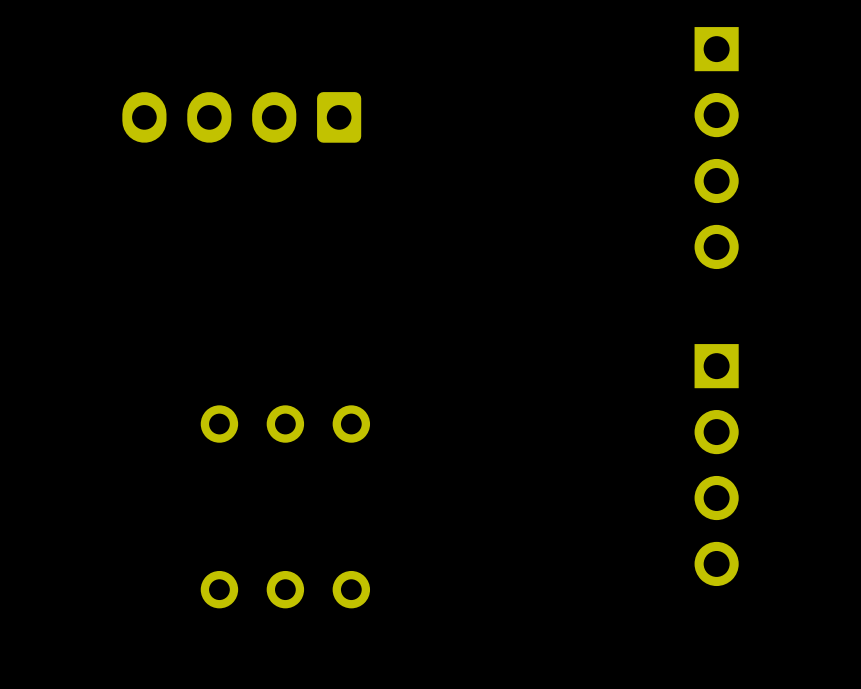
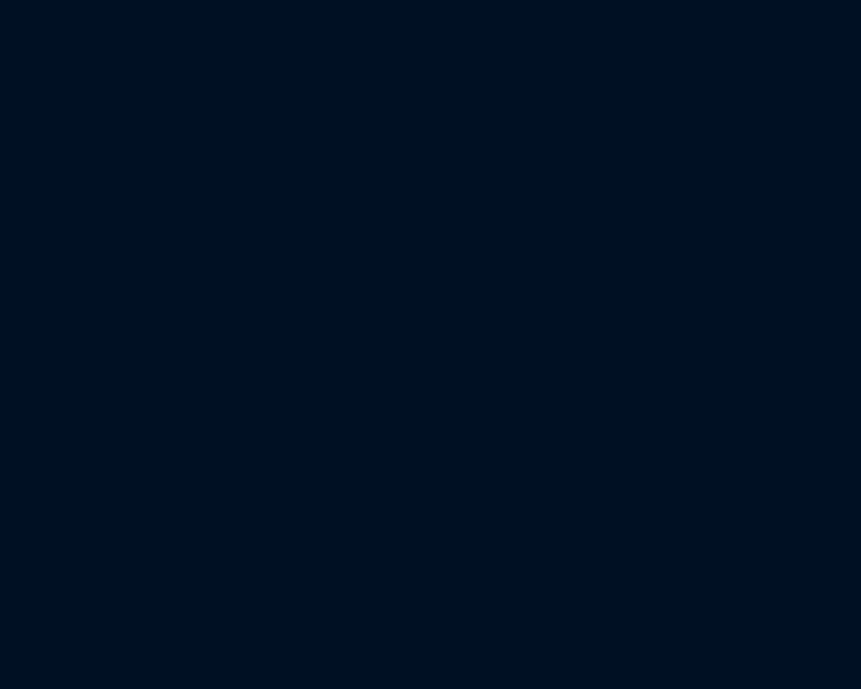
part: (241, 117) -> none
part: (716, 148) -> none
part: (285, 424) -> none
part: (716, 465) -> none
part: (285, 589) -> none

